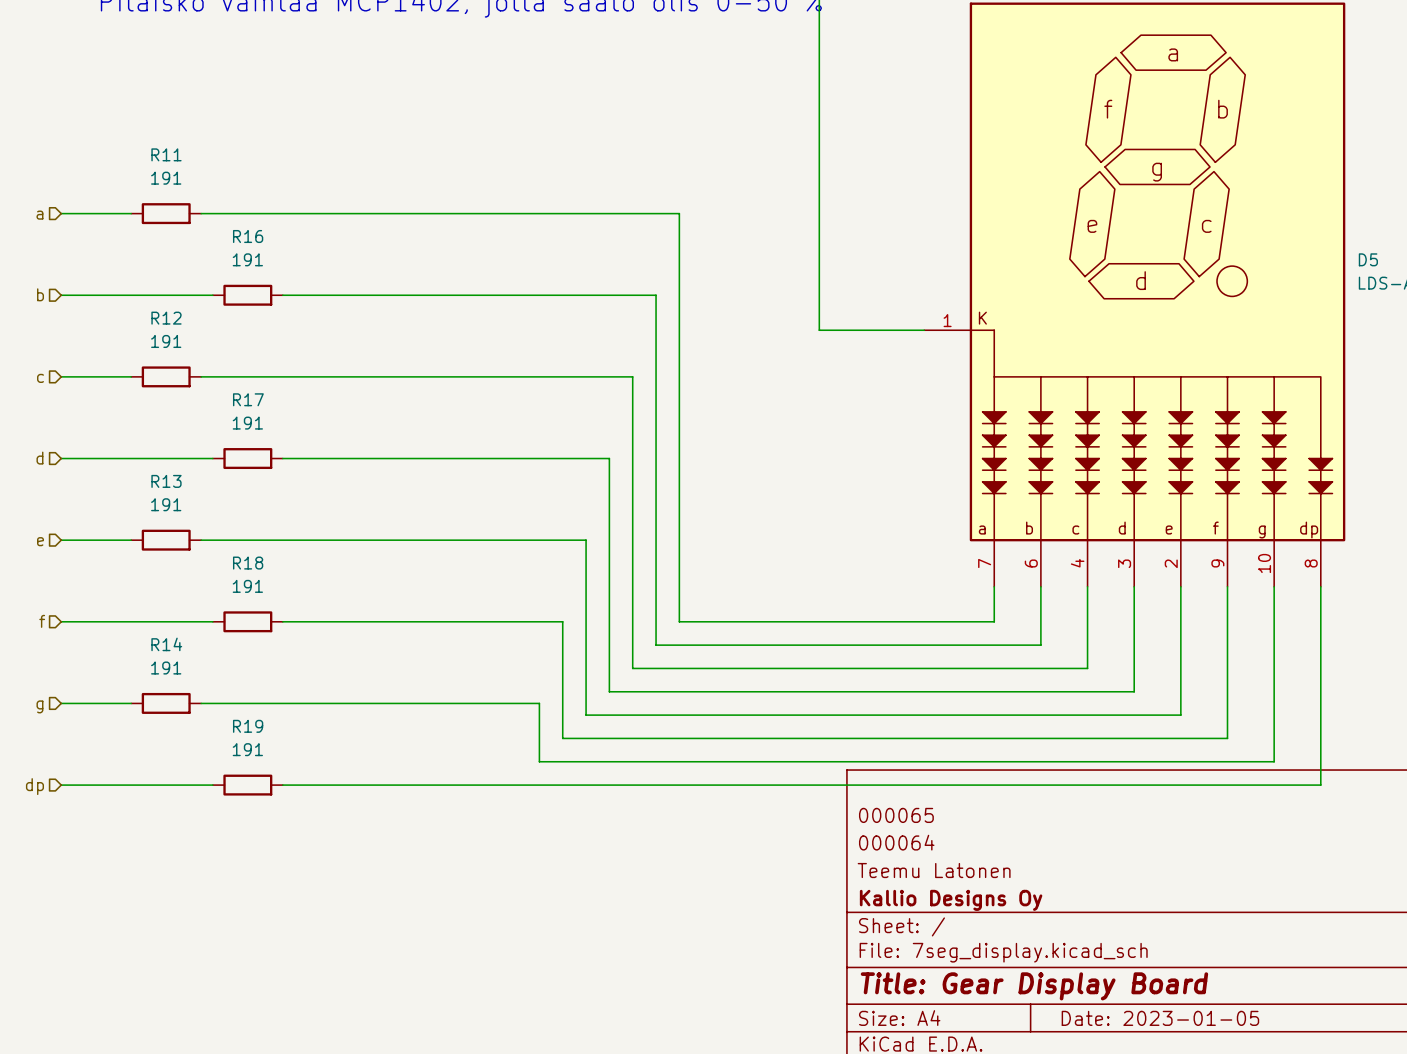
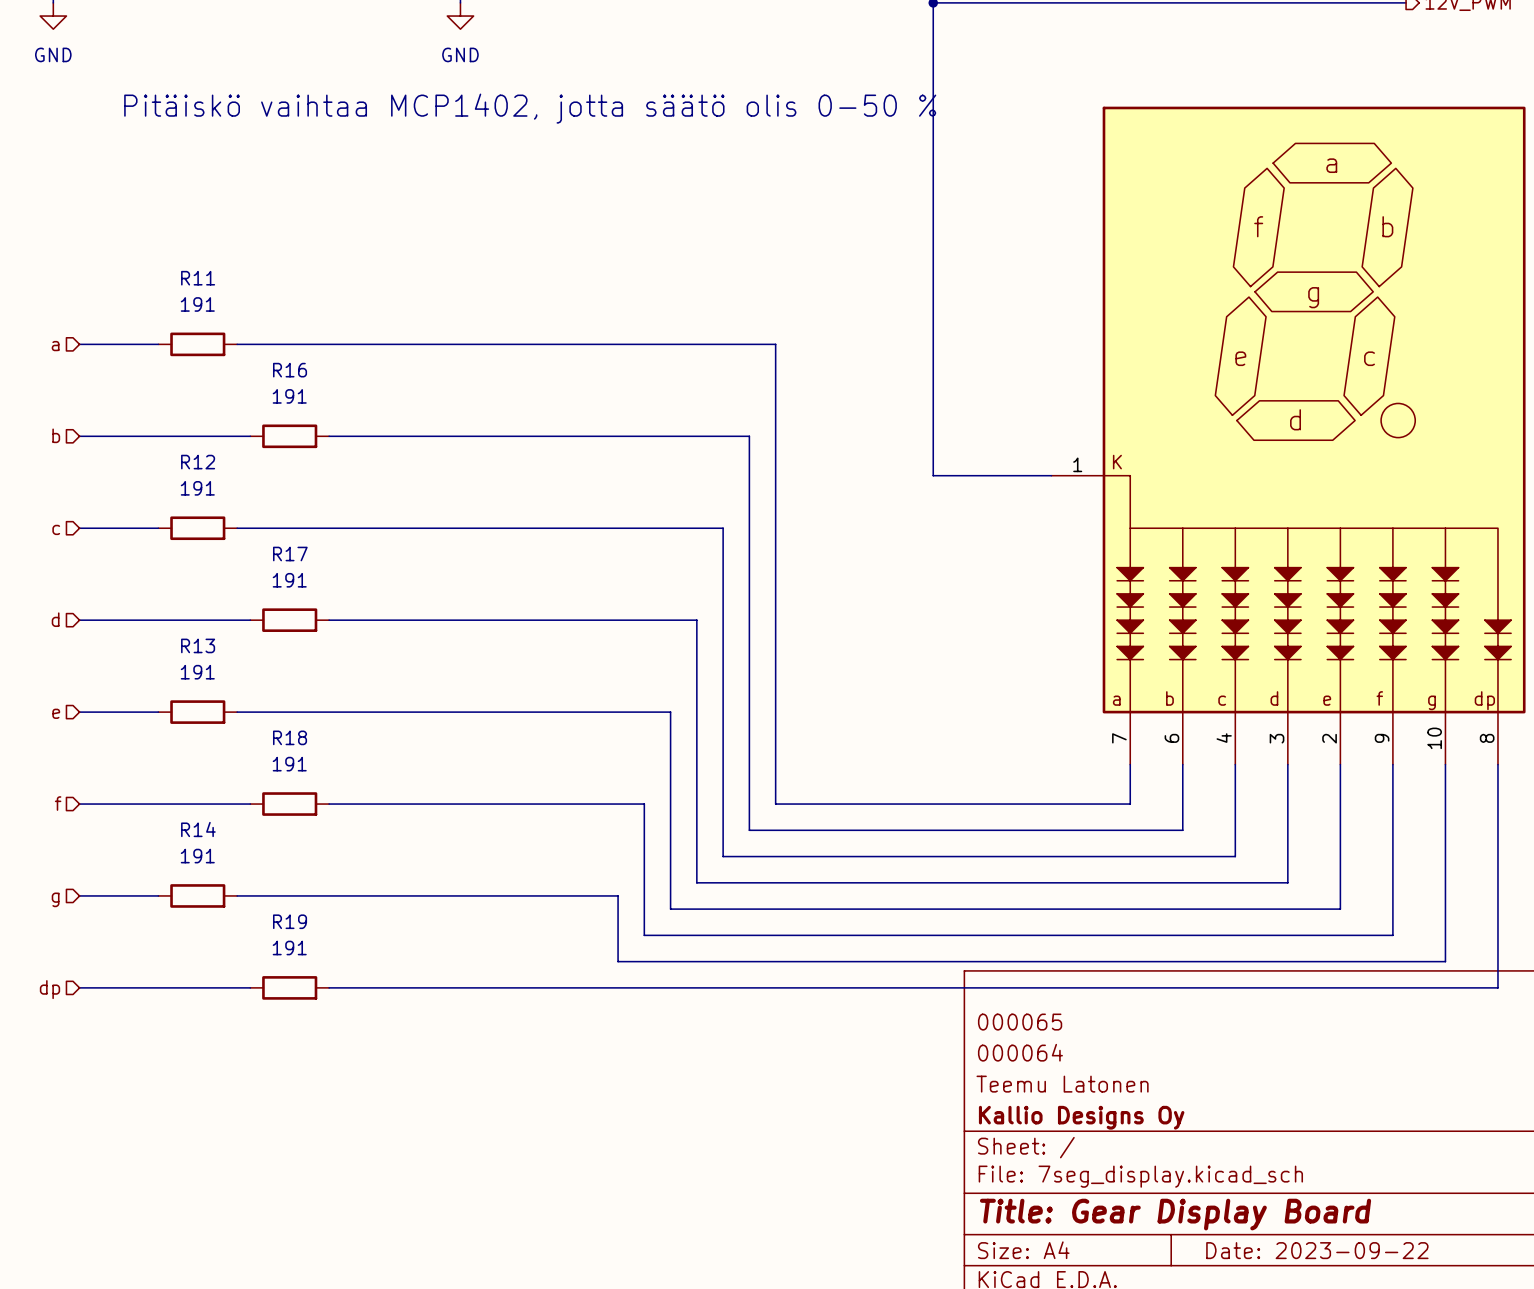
title block: Date: 2023-01-05 (1160, 1018) -> Date: 2023-09-22 (1317, 1250)

